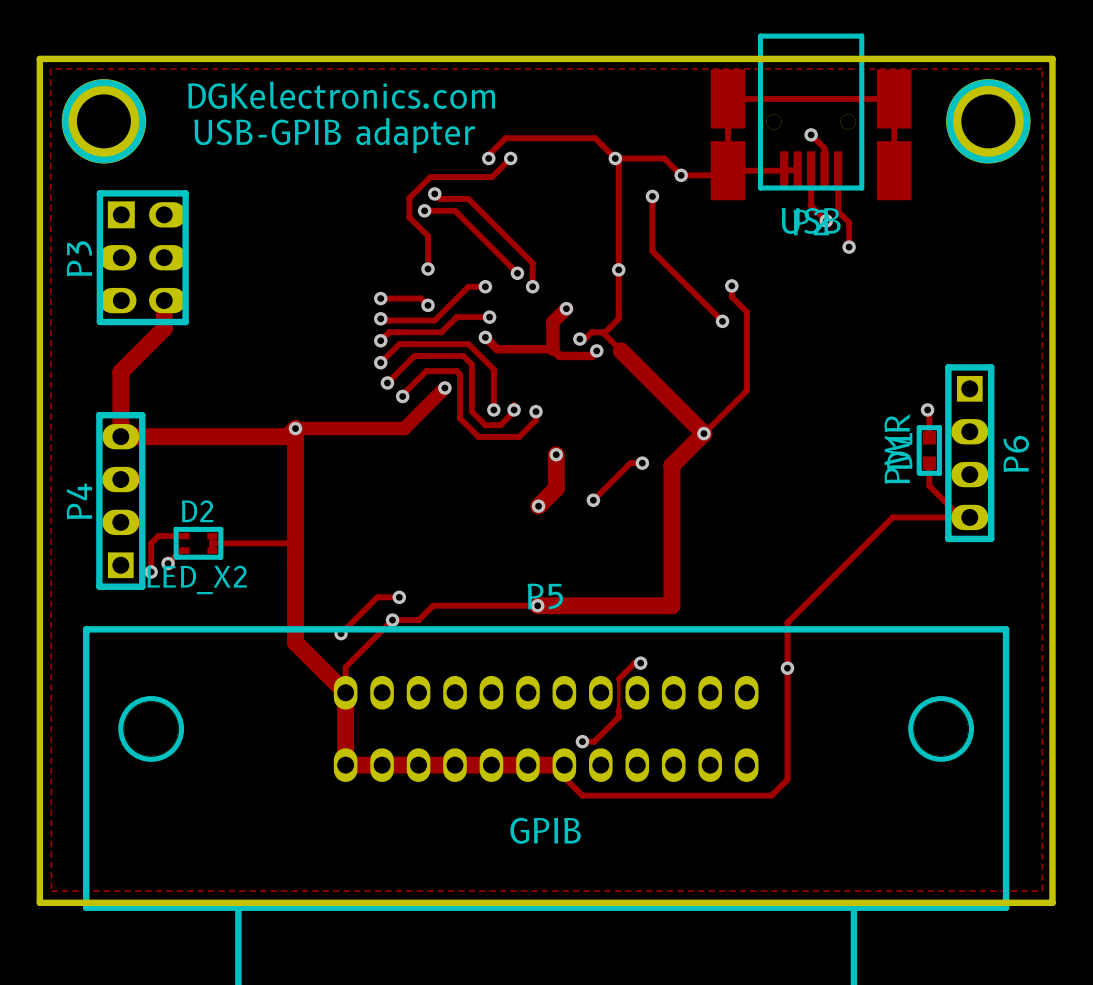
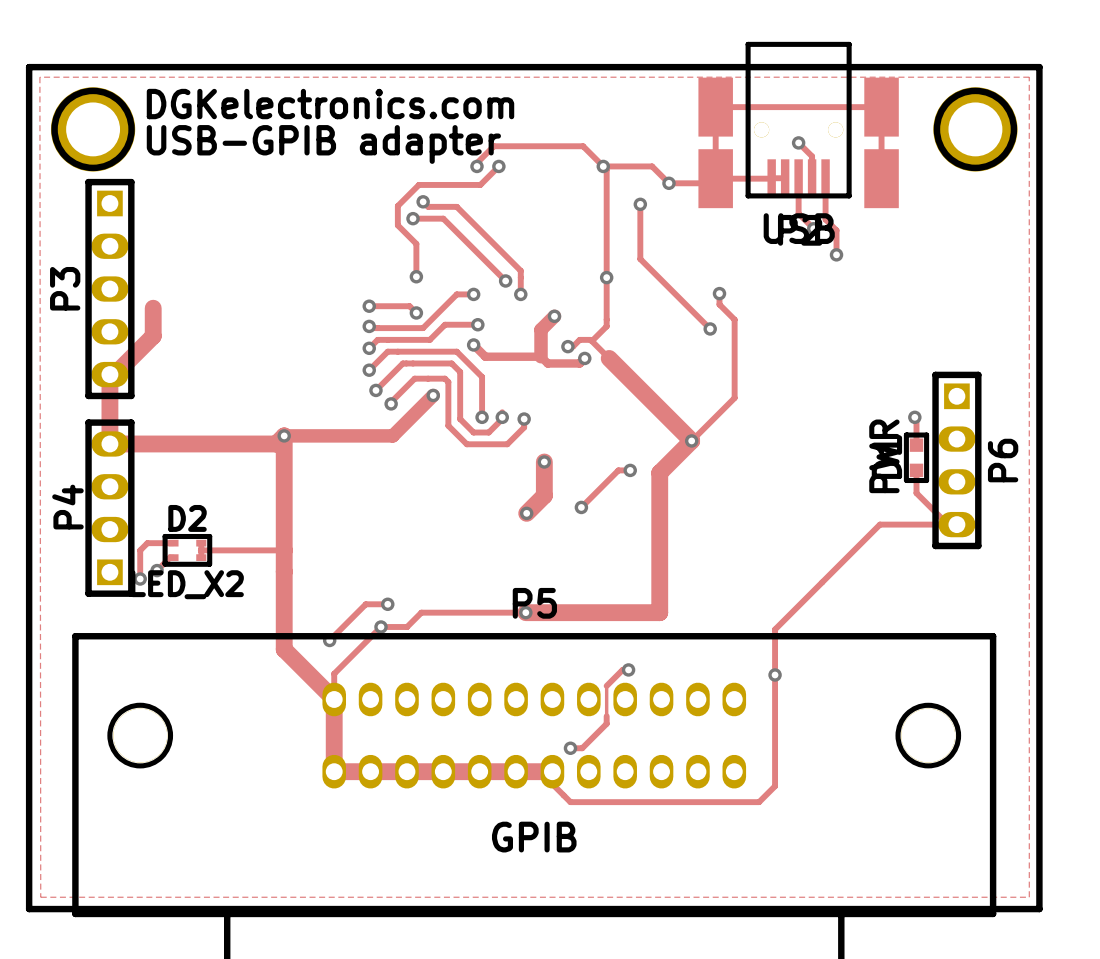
P3 footprint: [96, 190, 189, 326] -> [85, 178, 135, 400]

